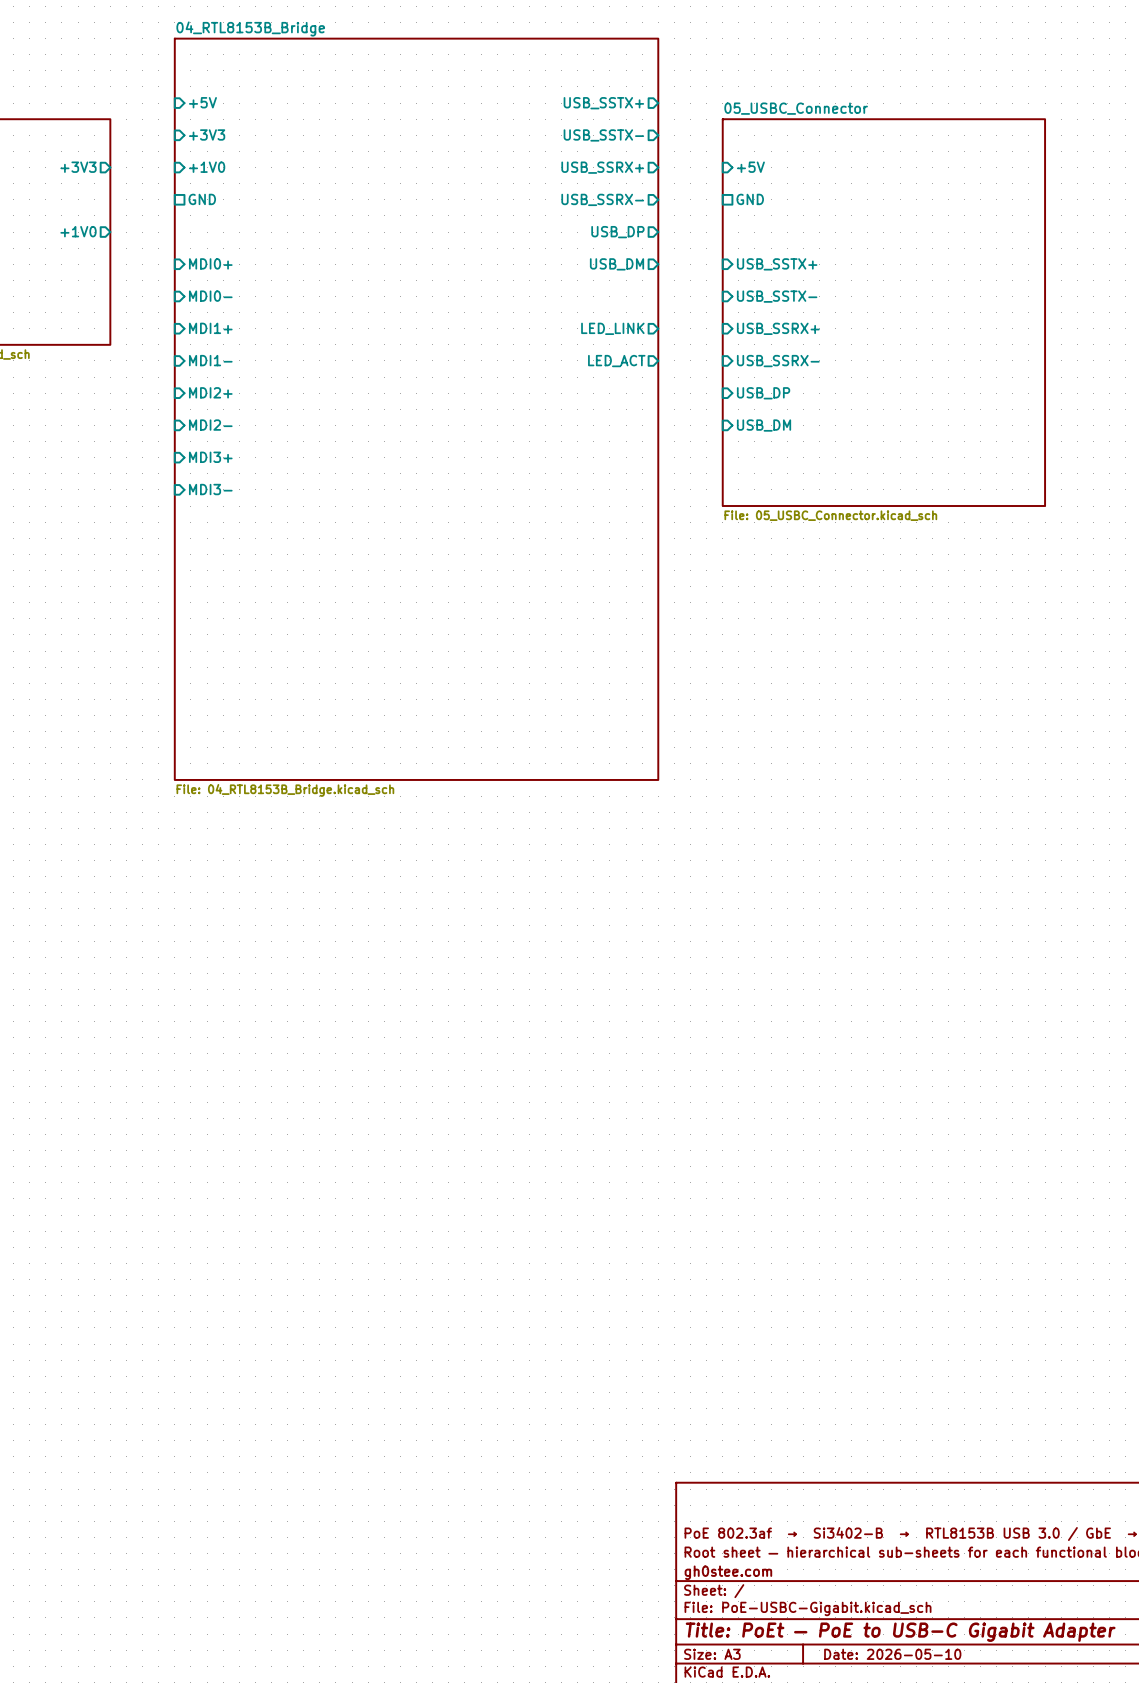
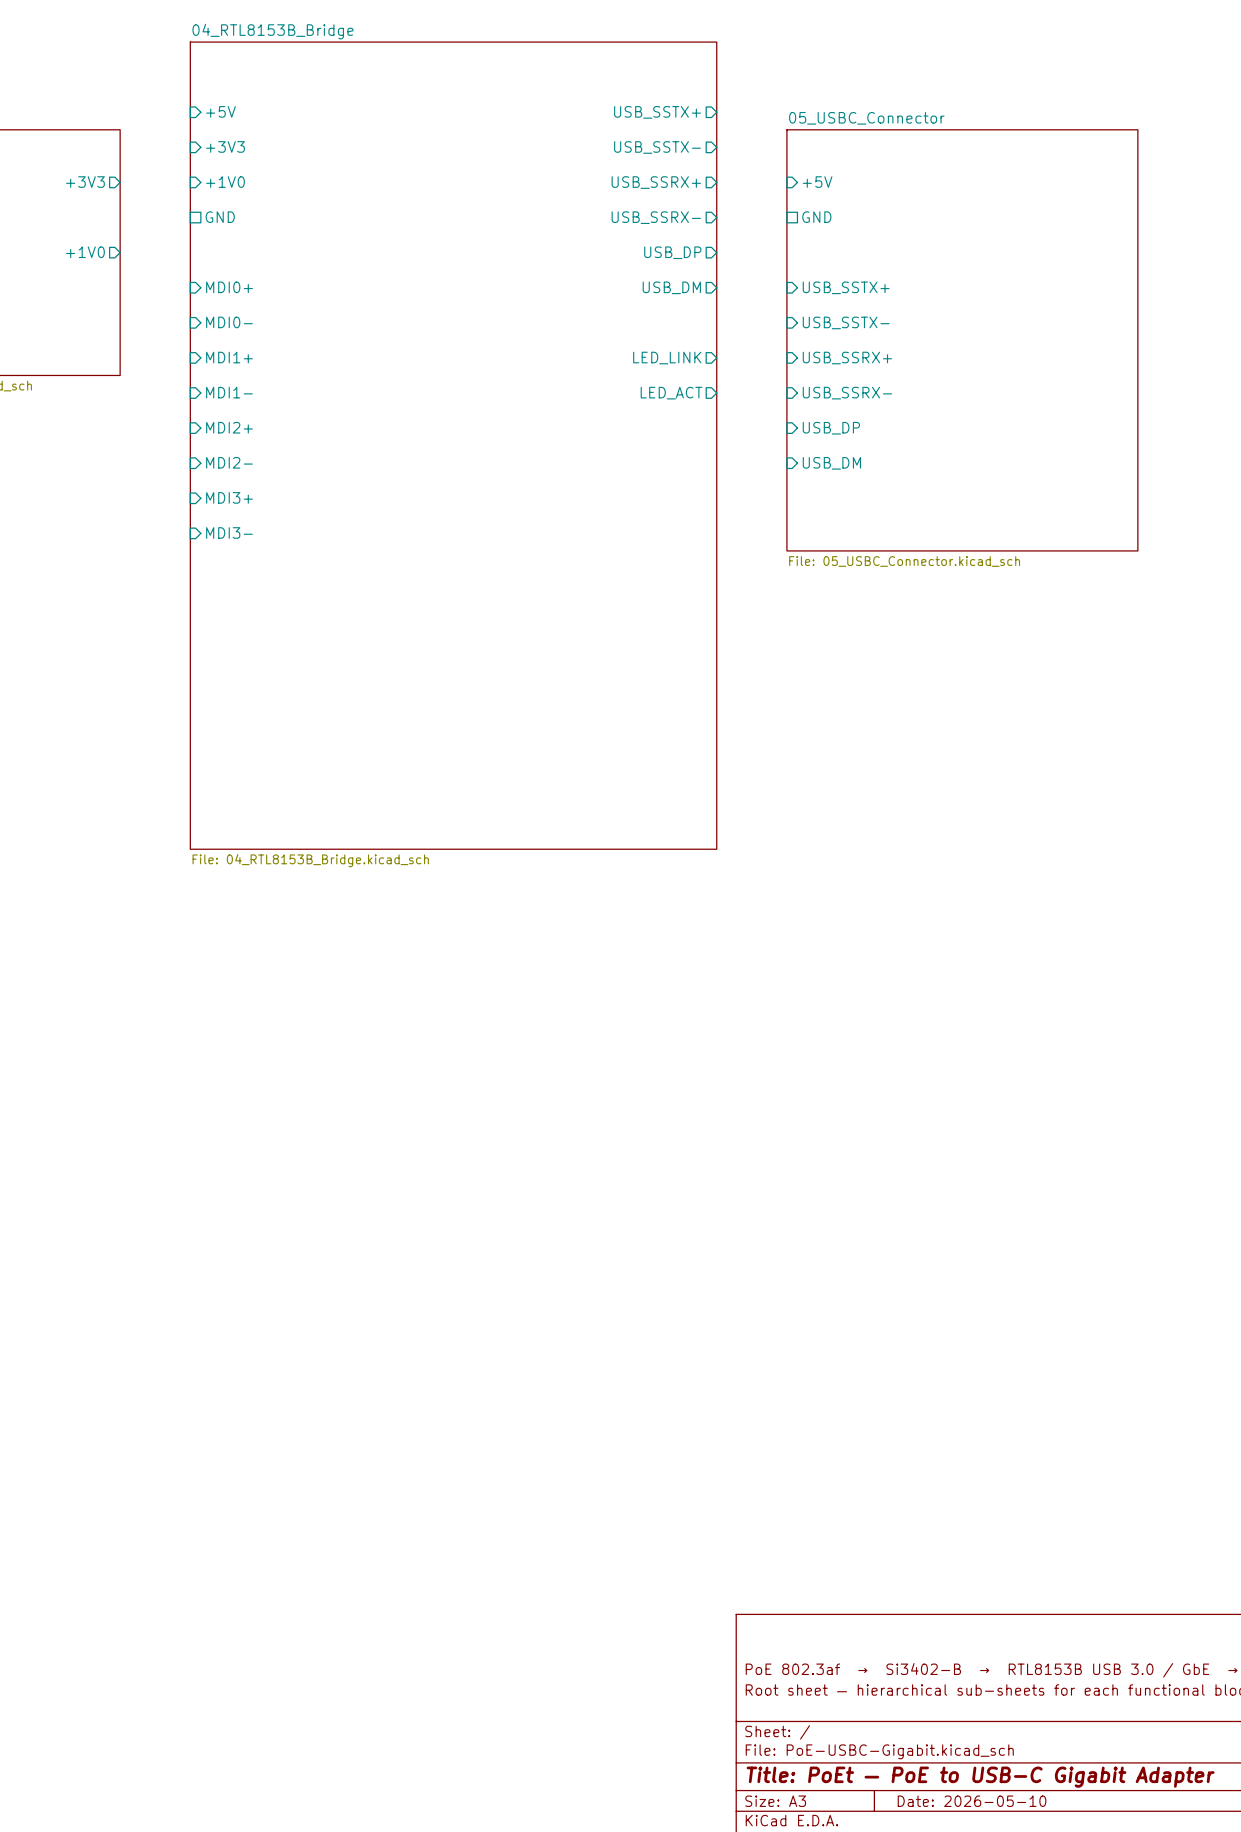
title block: gh0stee.com (728, 1572) -> none

